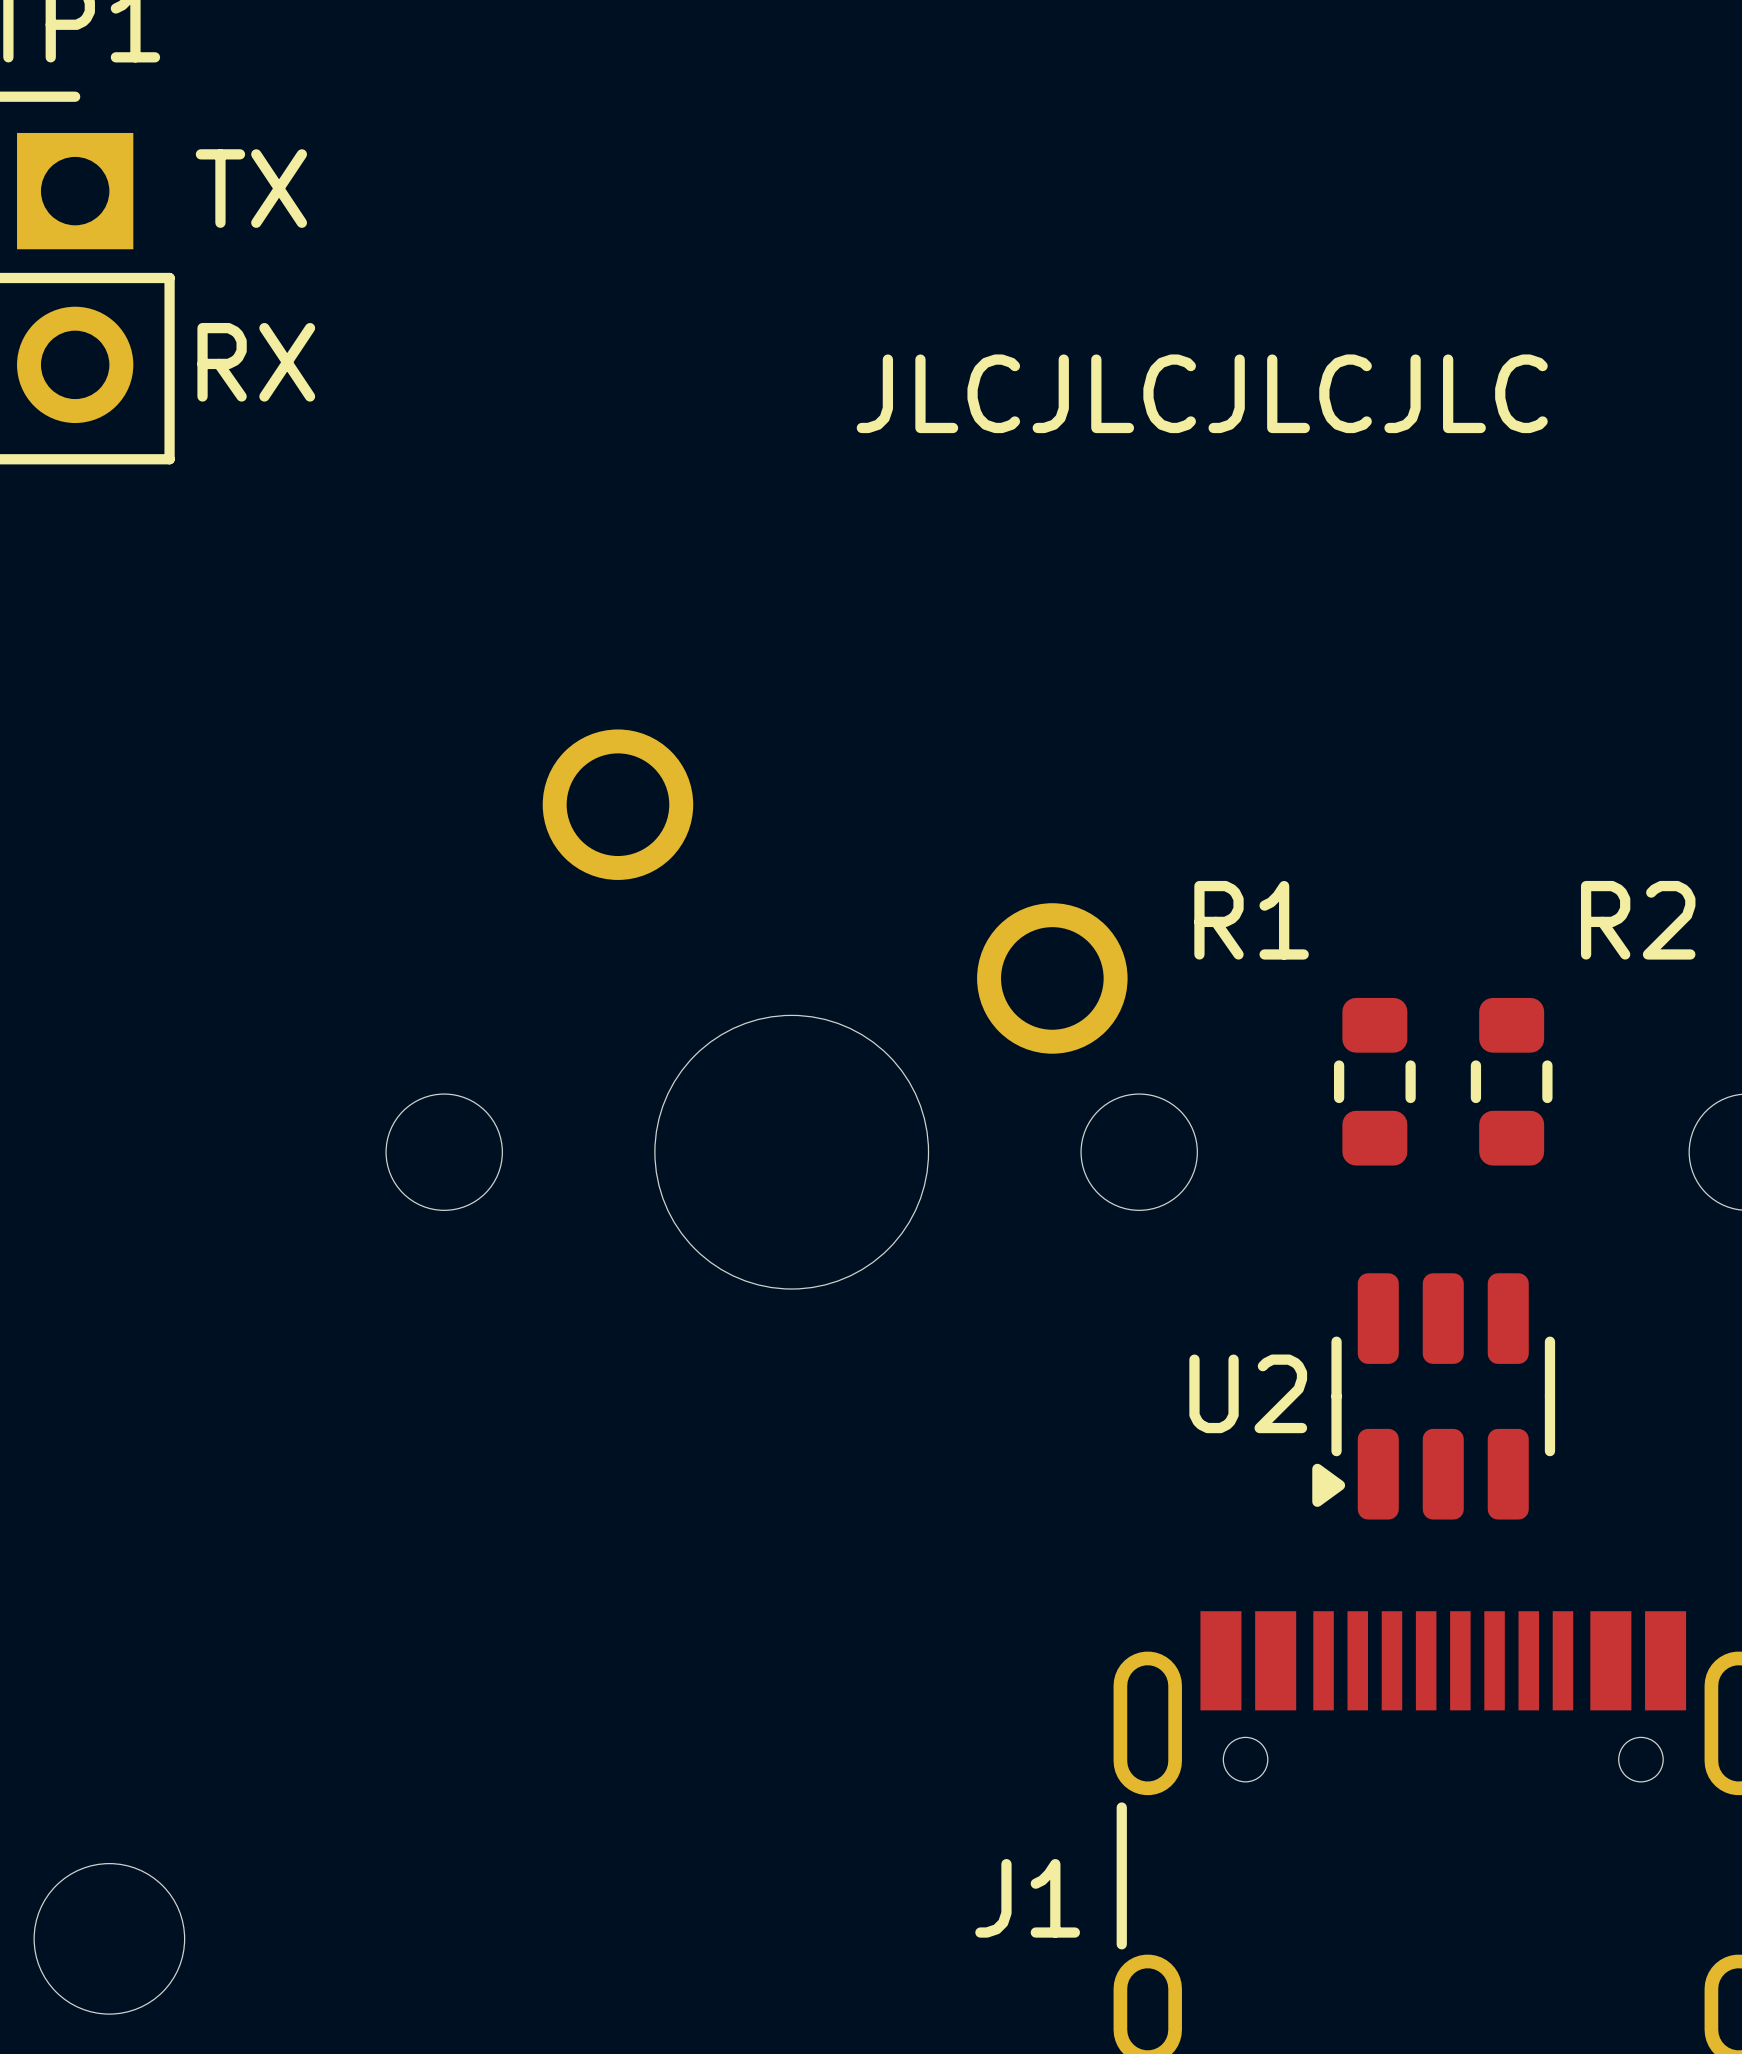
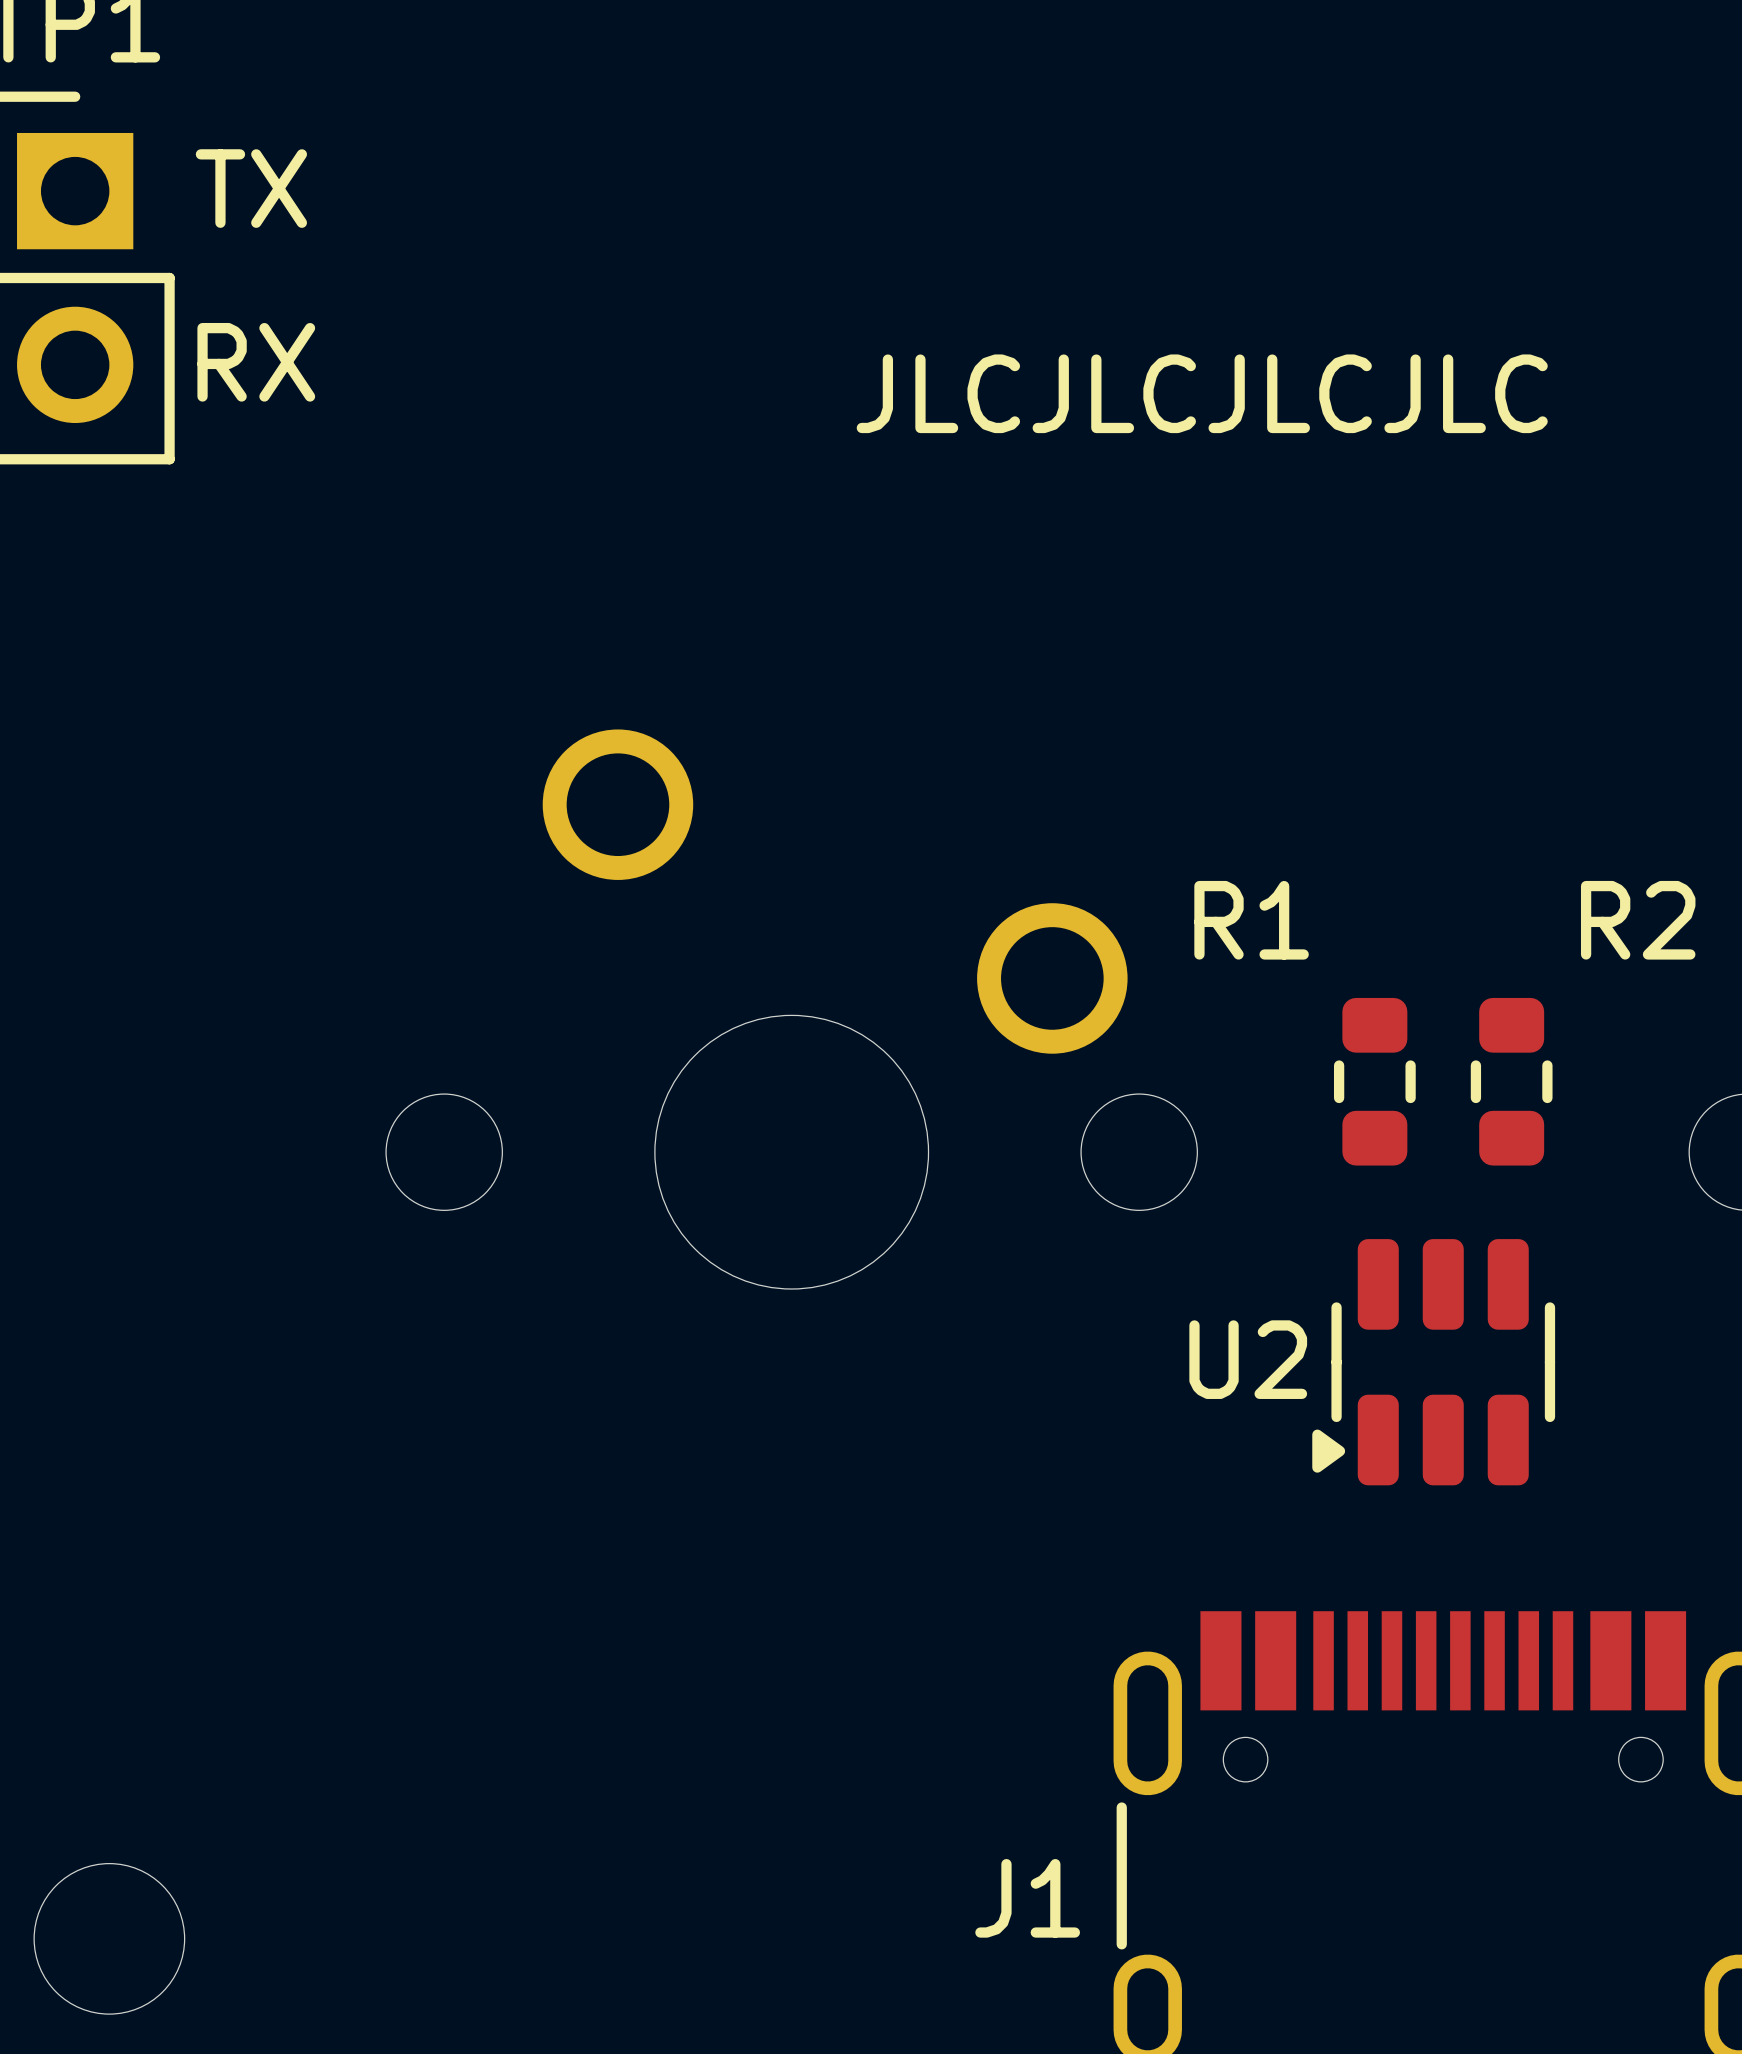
U2 position: (1433, 1396) -> (1433, 1362)

